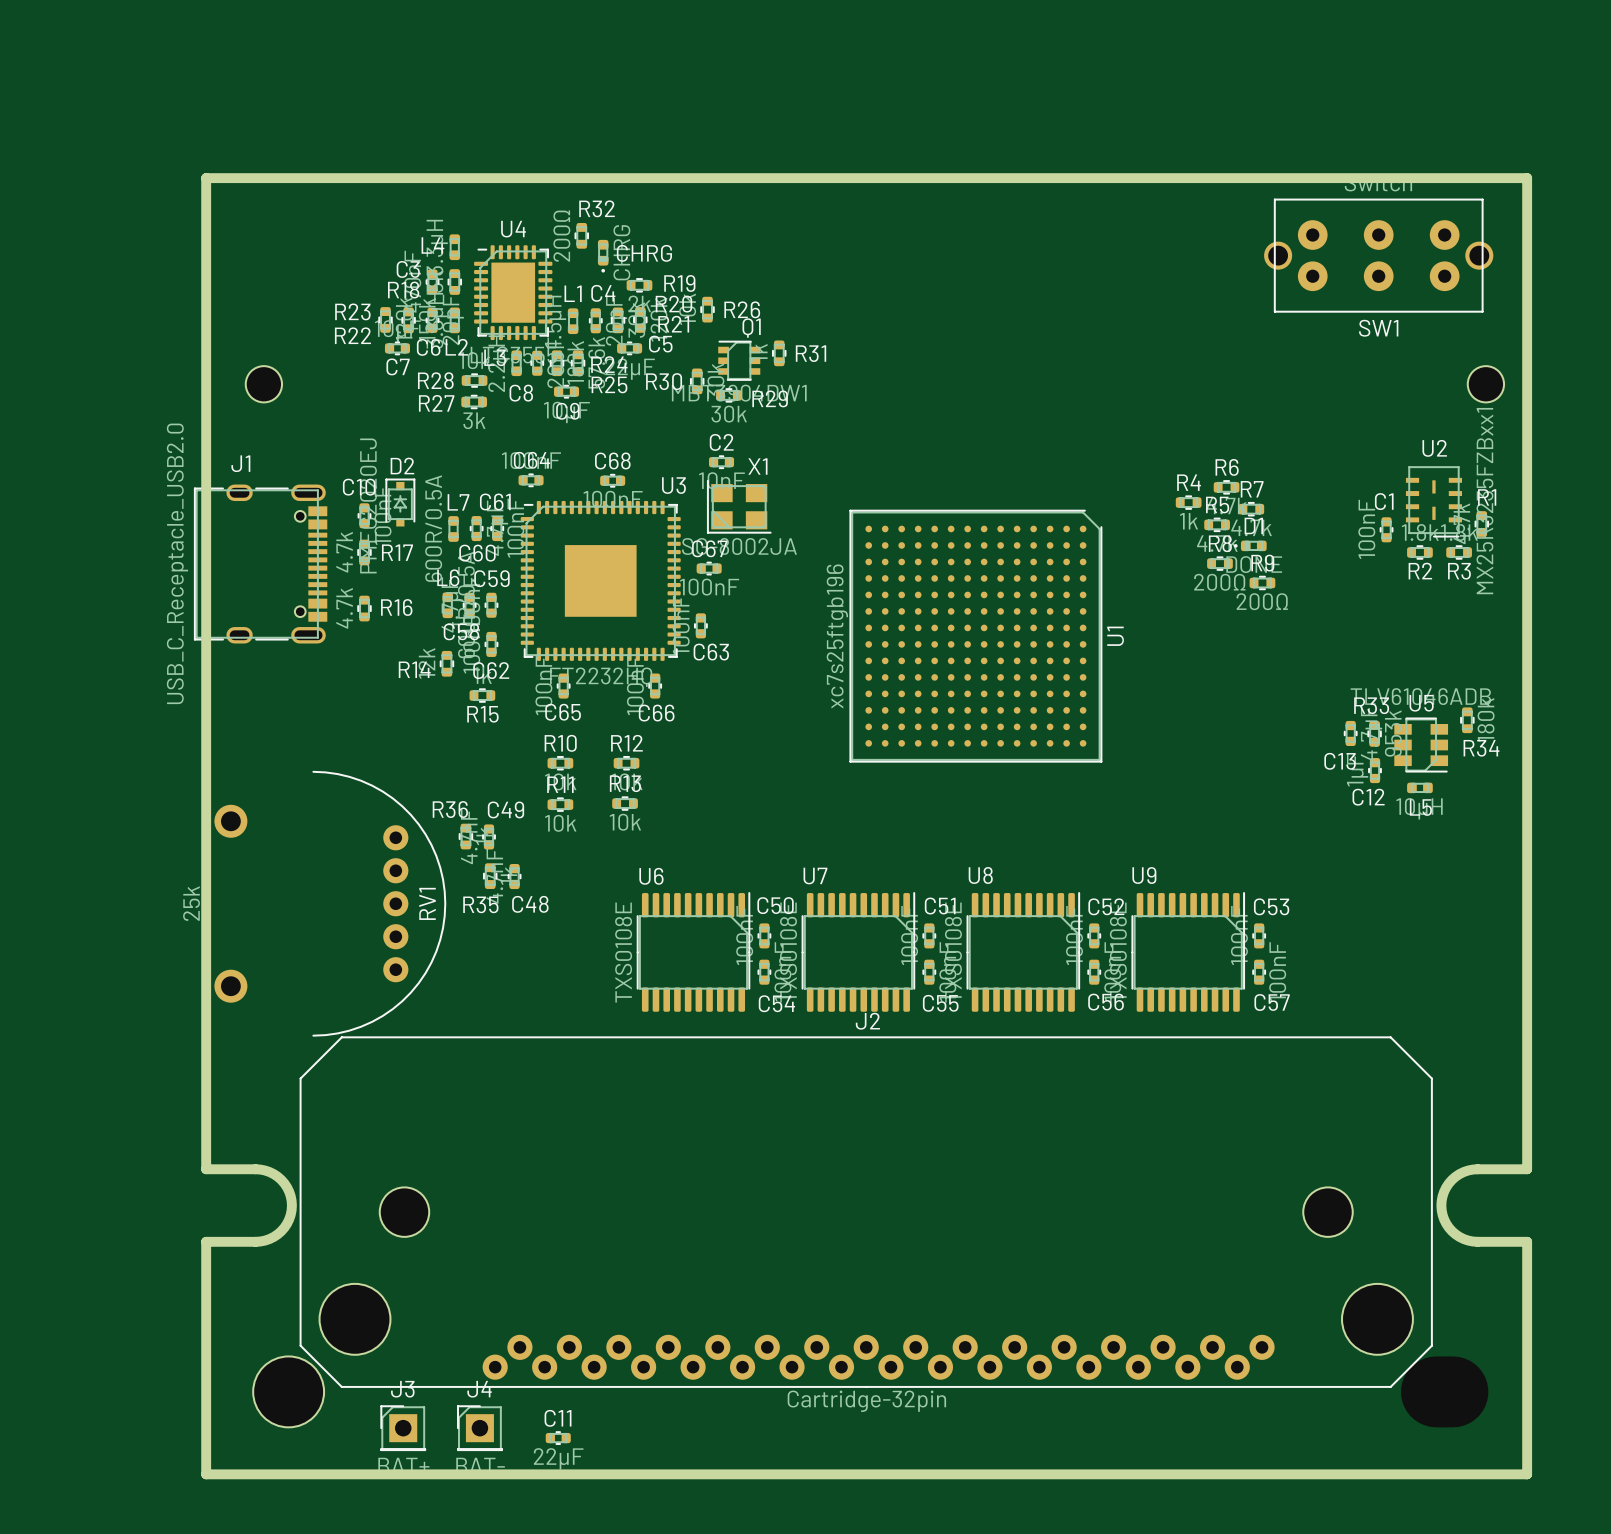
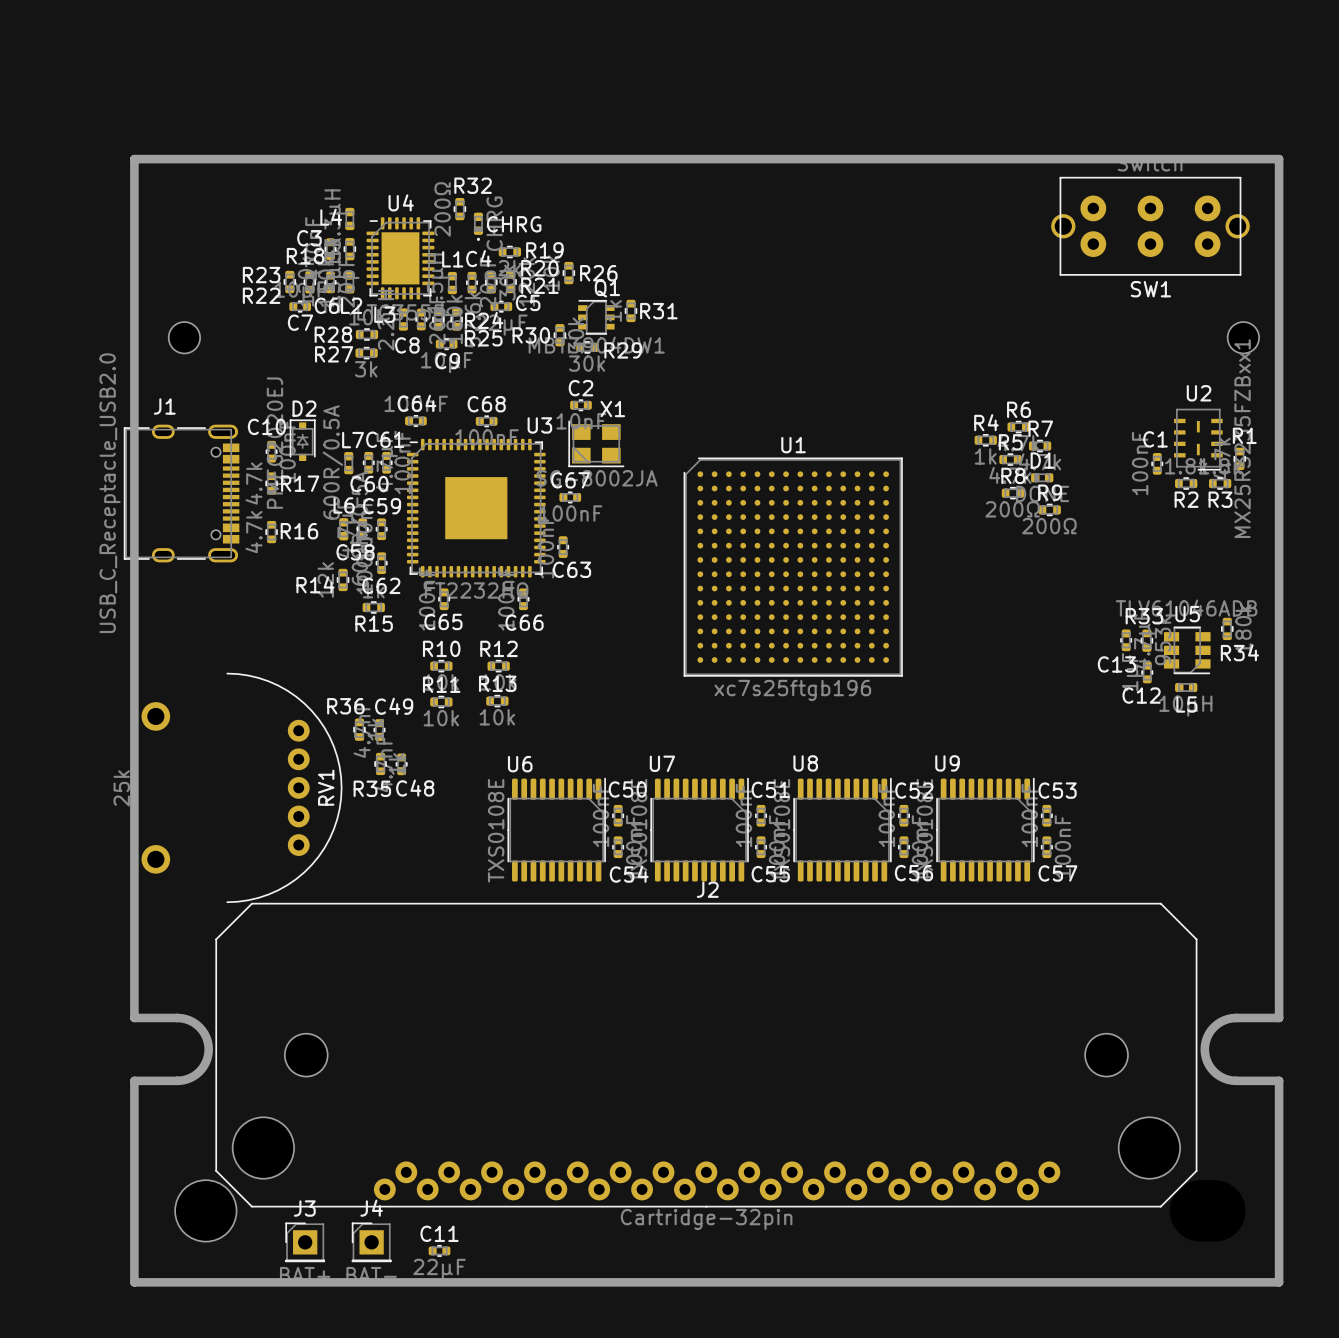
U1 rotation: 0° (975, 636) -> 90° counterclockwise (793, 567)

